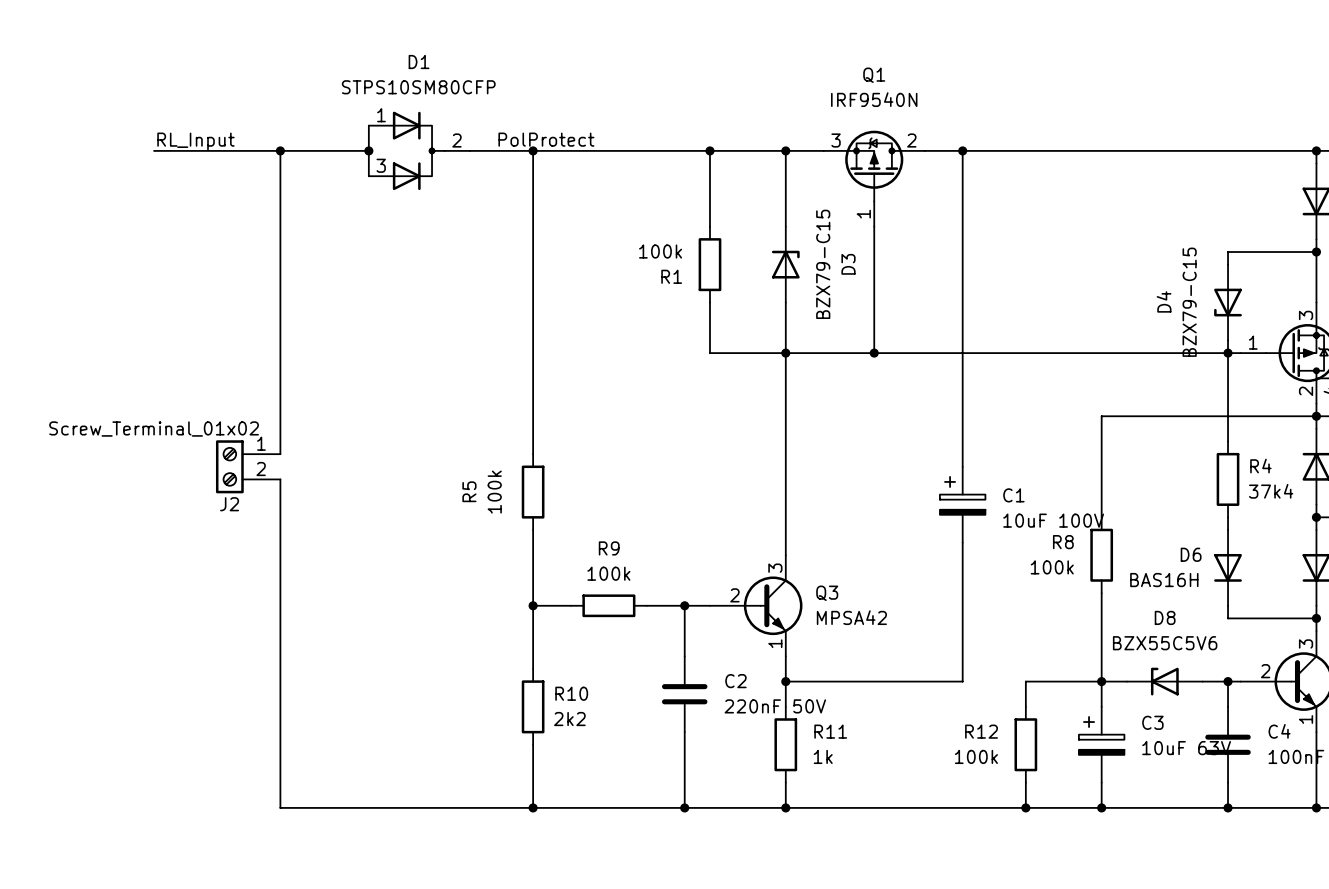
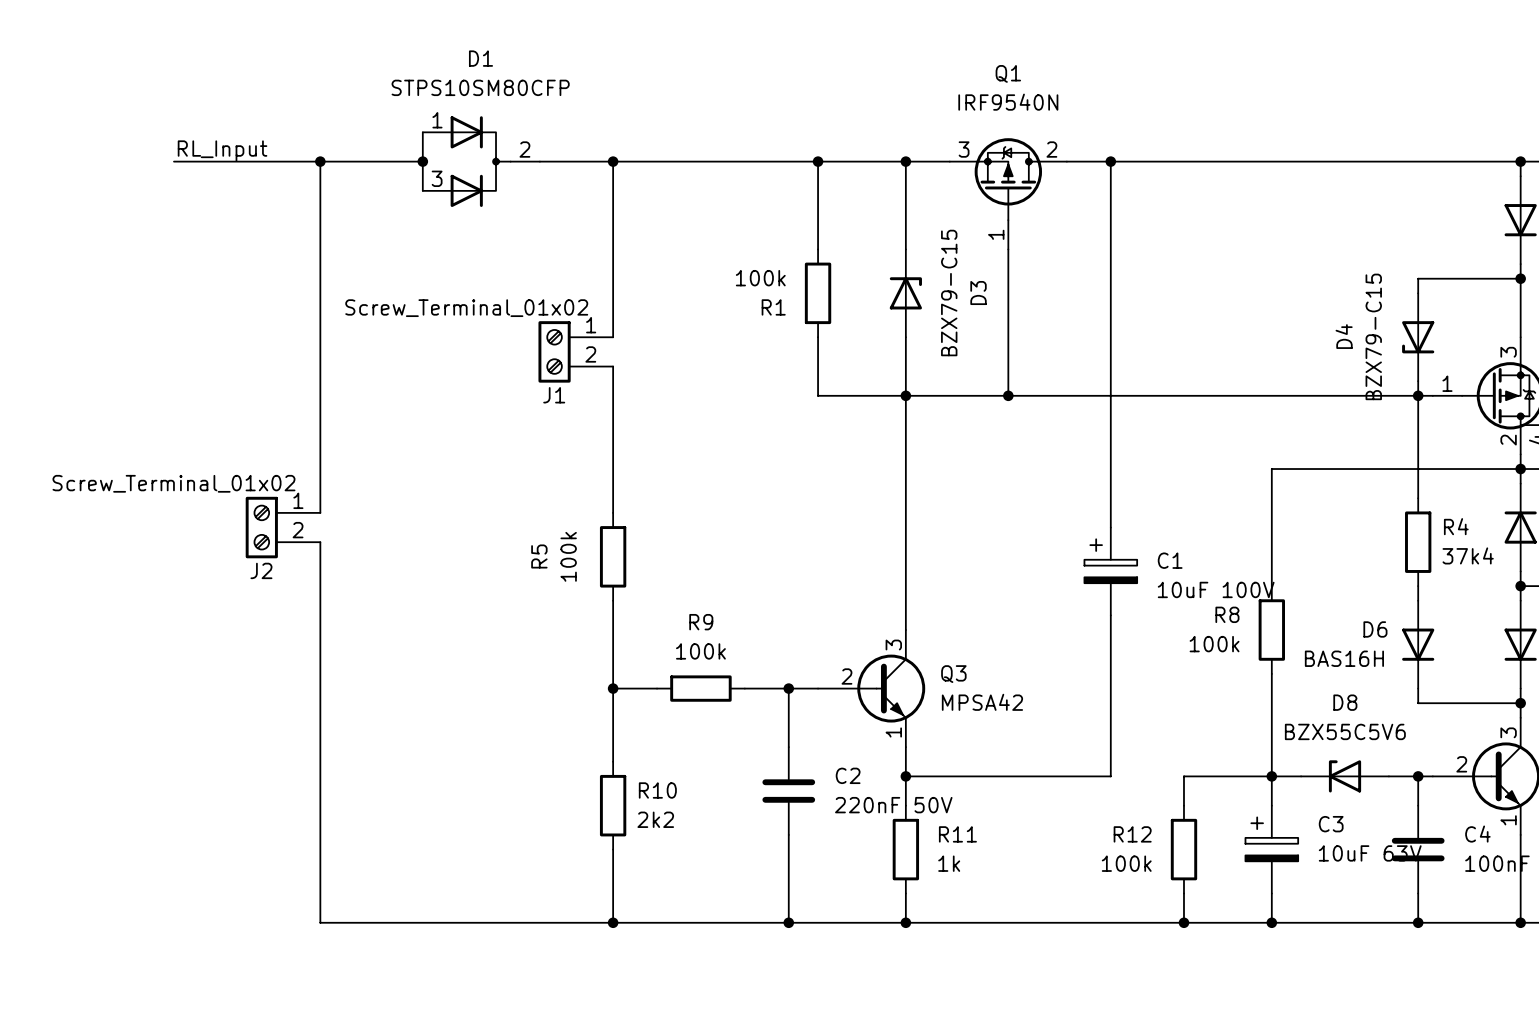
label: PolProtect (546, 139) -> none
wire: (533, 302) (533, 327) -> none
J1: none -> Screw_Terminal_01x02 (575, 351)

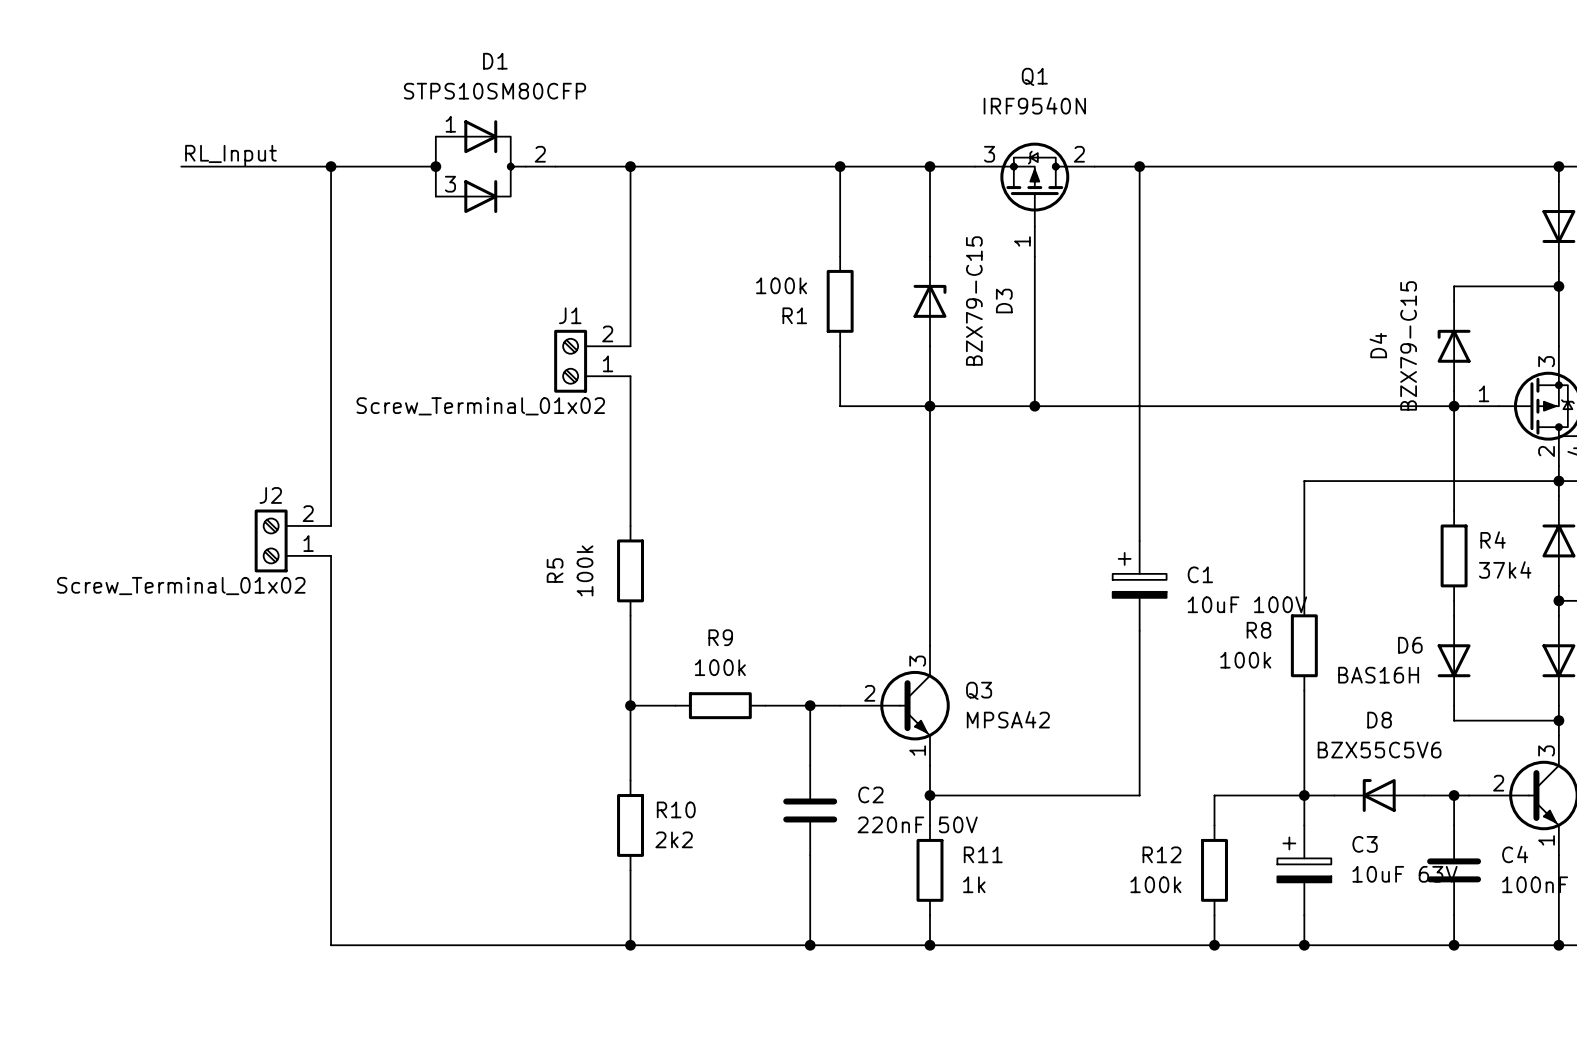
D4 flip: as is (1418, 337) -> up-down (1454, 346)
J1 flip: as is (554, 351) -> up-down (570, 361)
J2 flip: as is (261, 527) -> up-down (271, 540)

